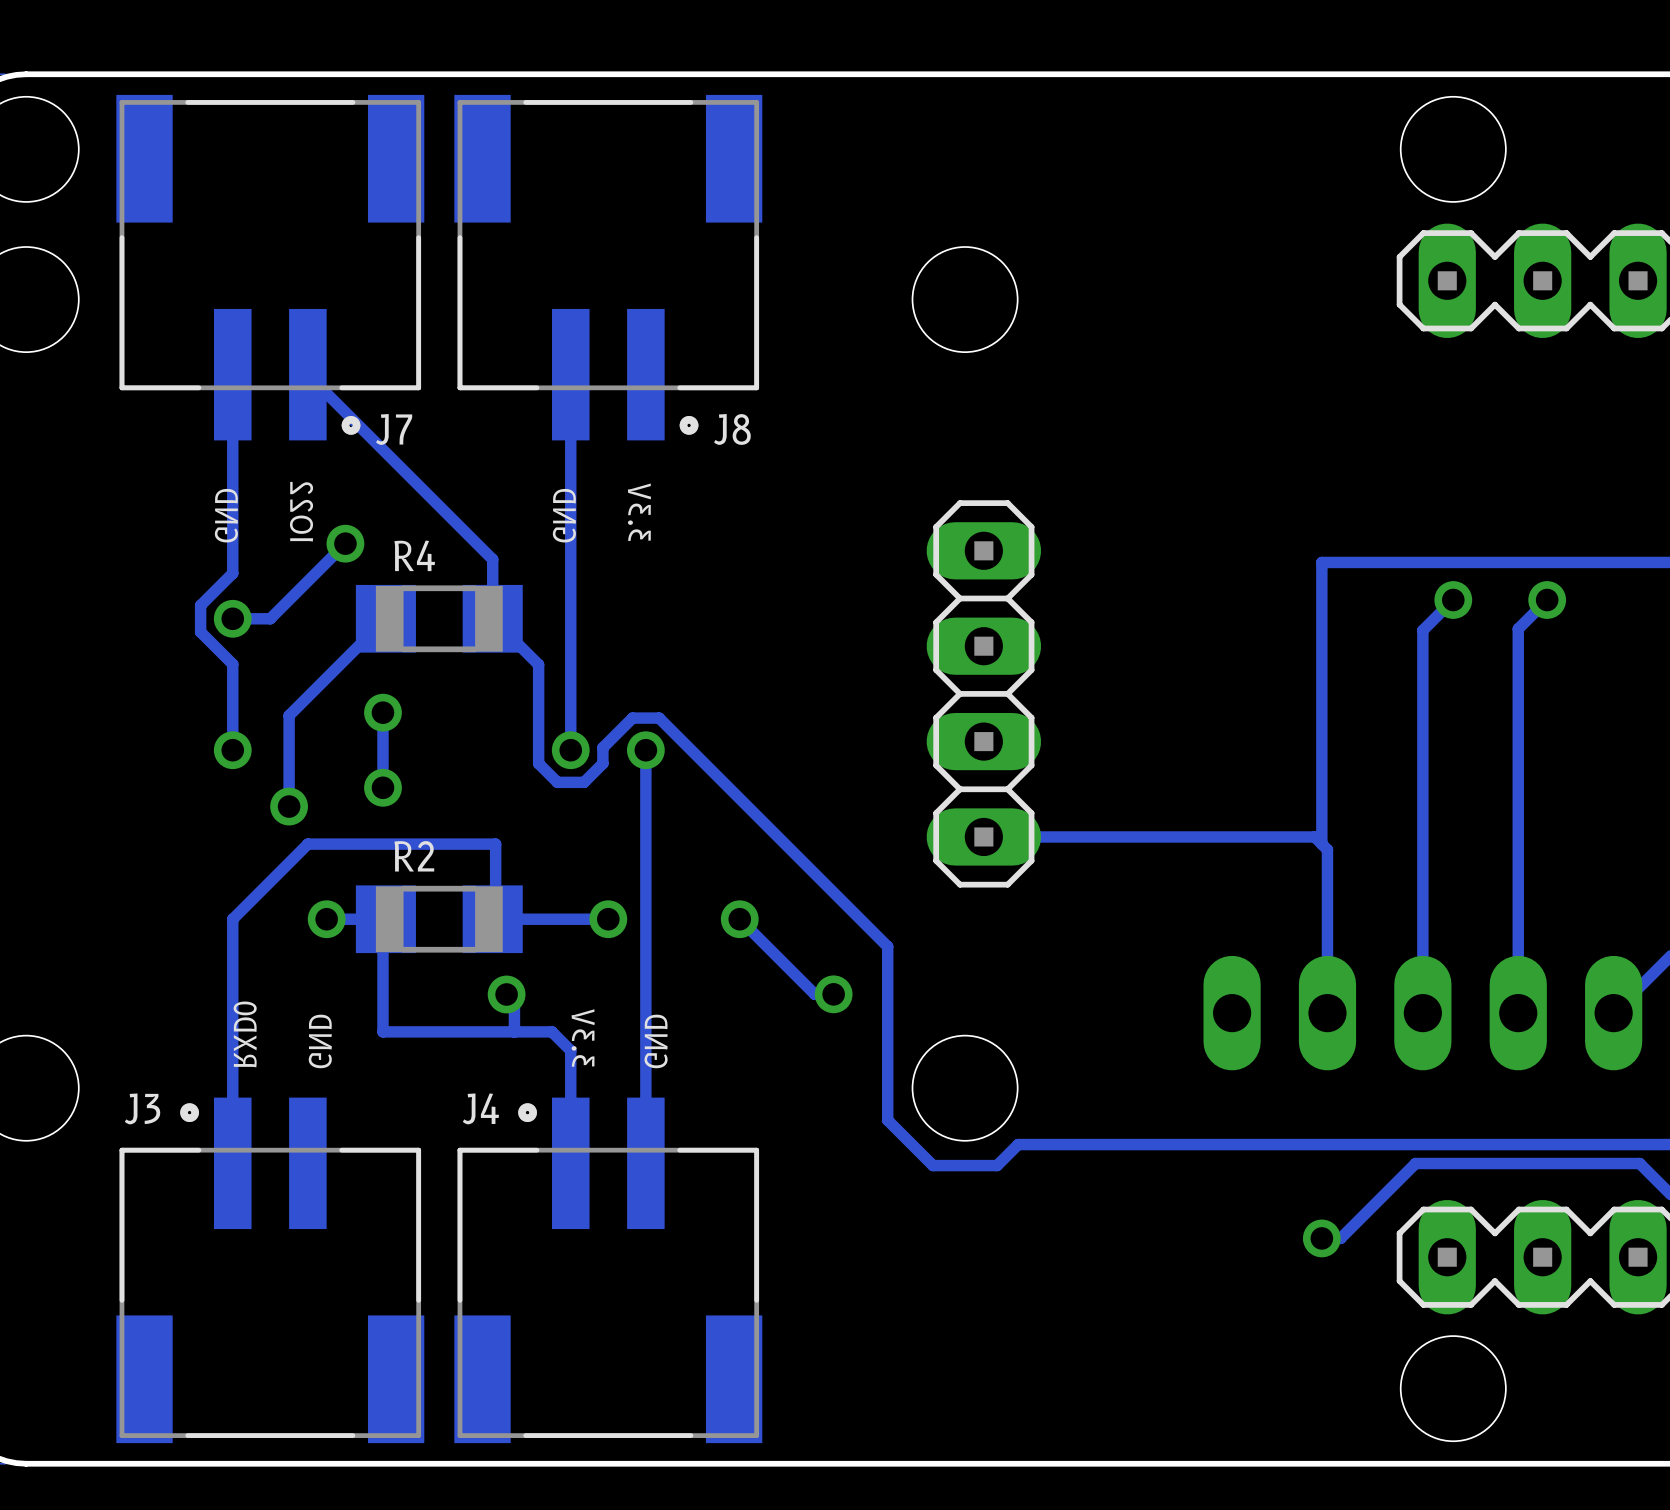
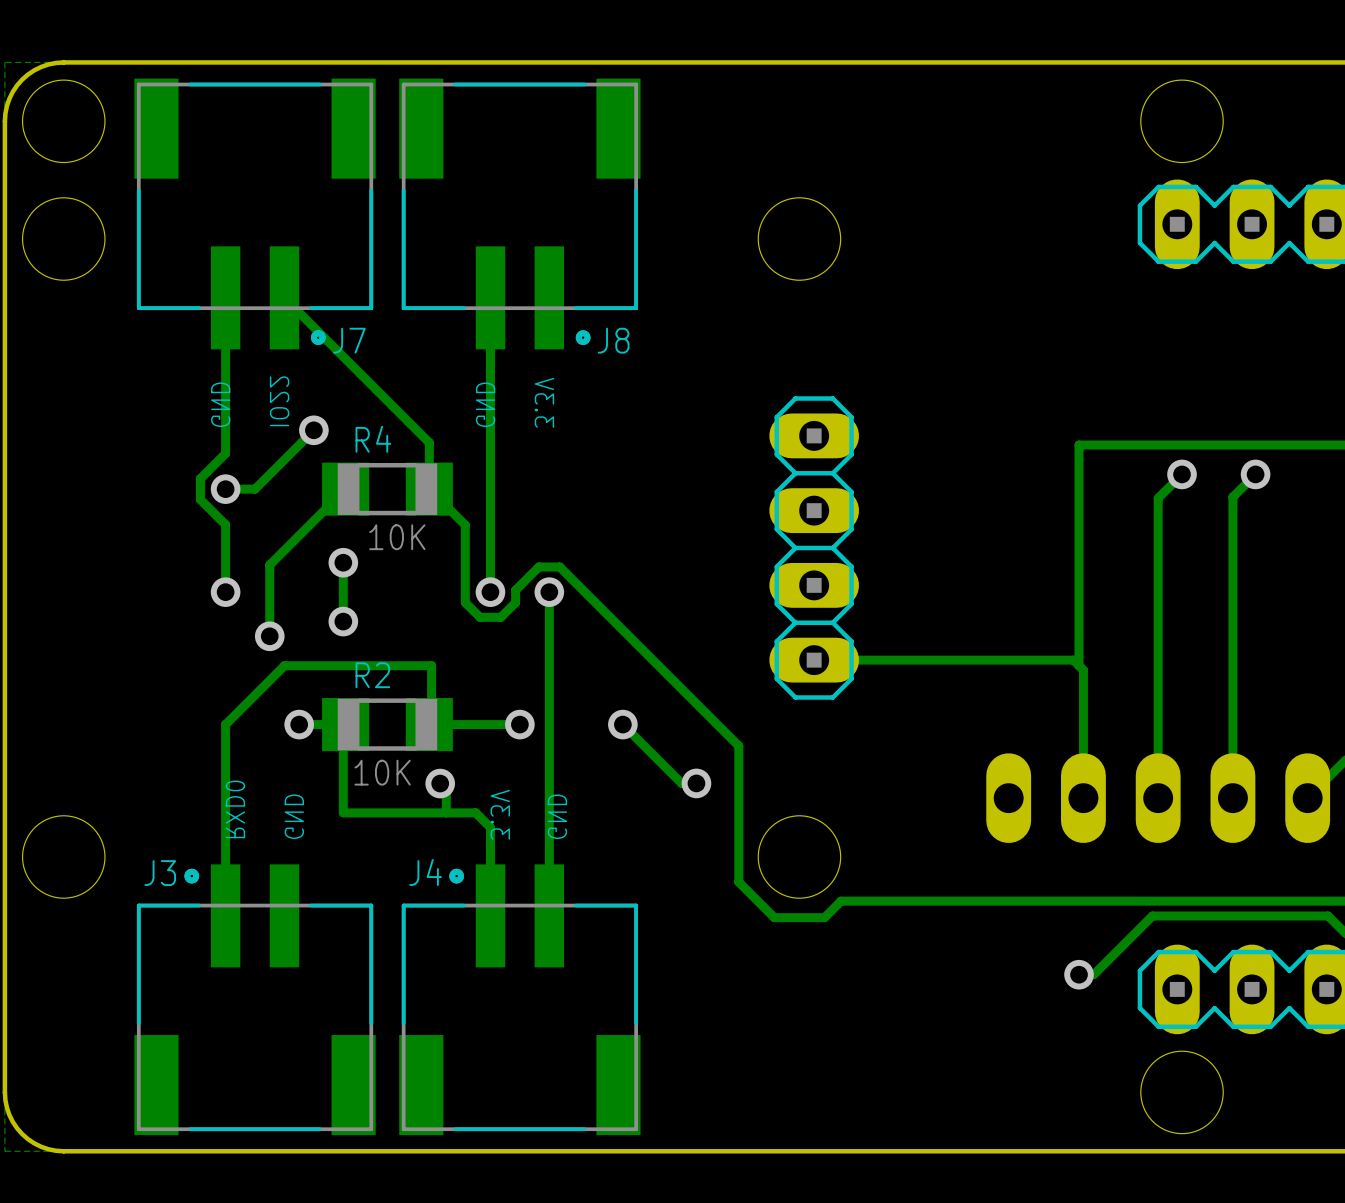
R4 value: none -> 10K (397, 537)
R2 value: none -> 10K (382, 772)

